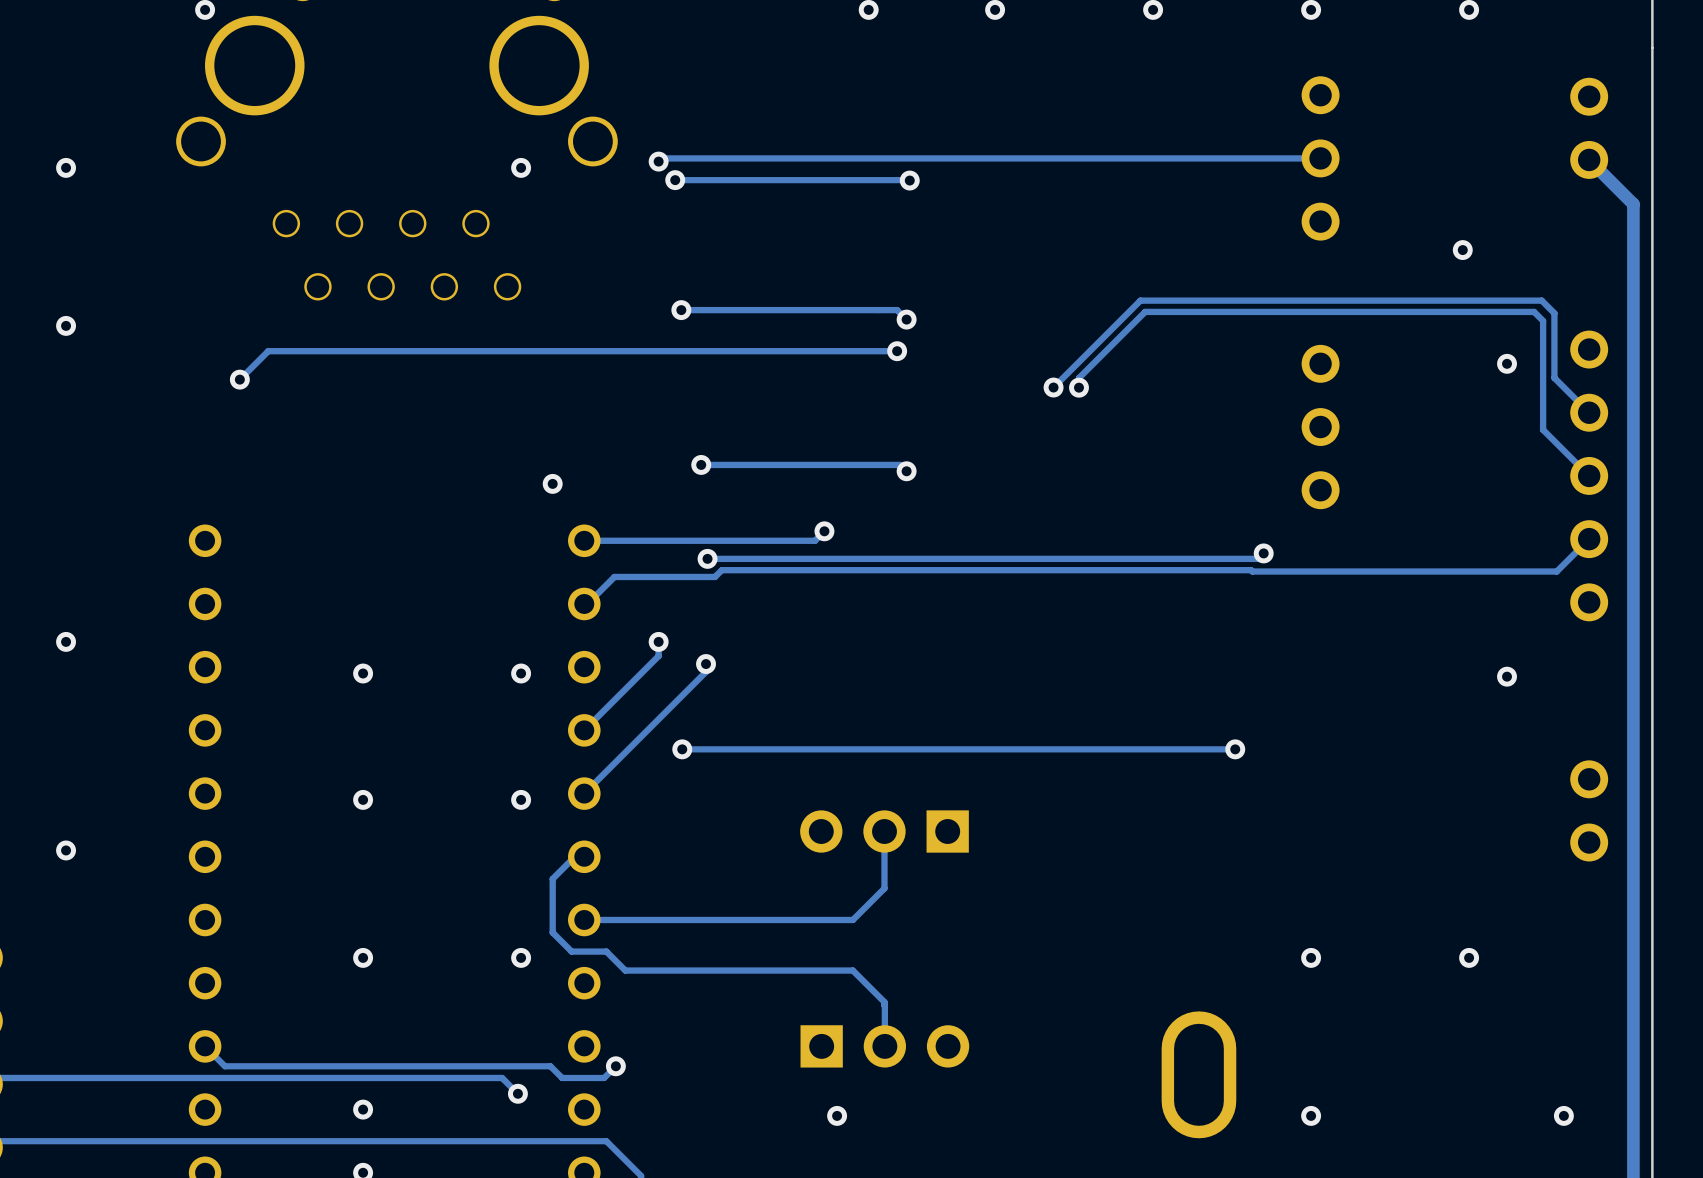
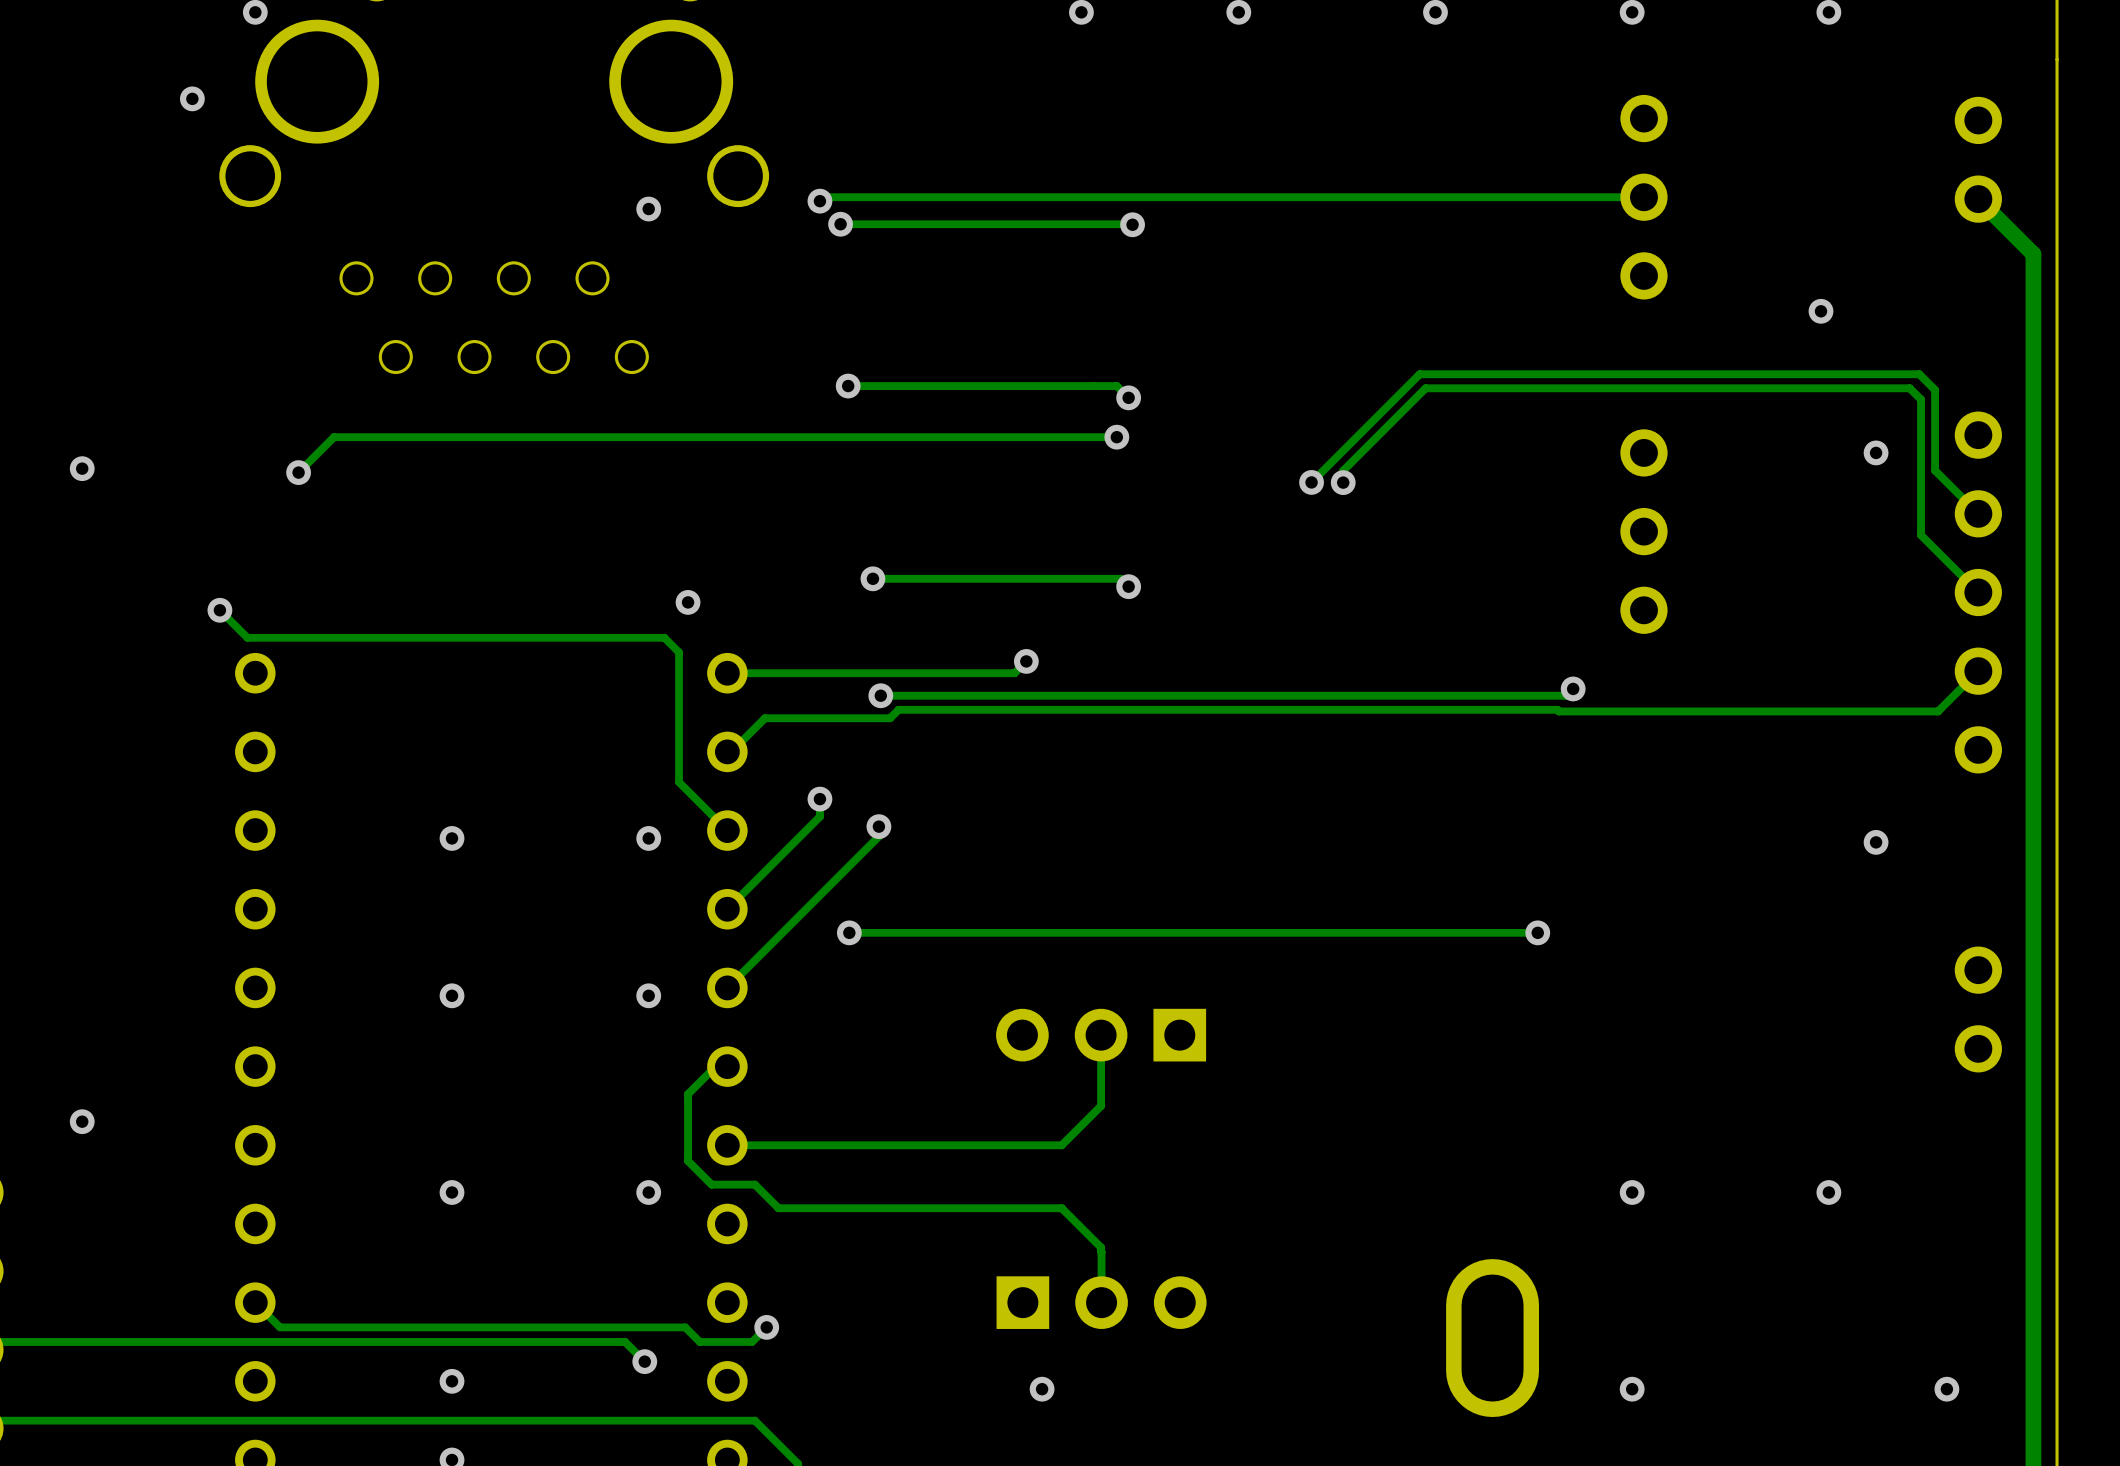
via: none -> (192, 98)
via: (66, 167) -> none
via position: (66, 325) -> (82, 468)
track: none -> (219, 610) (247, 637) (664, 637) (679, 652) (679, 782) (727, 830)
via: none -> (219, 610)
via: (66, 641) -> none
via position: (66, 850) -> (82, 1121)

